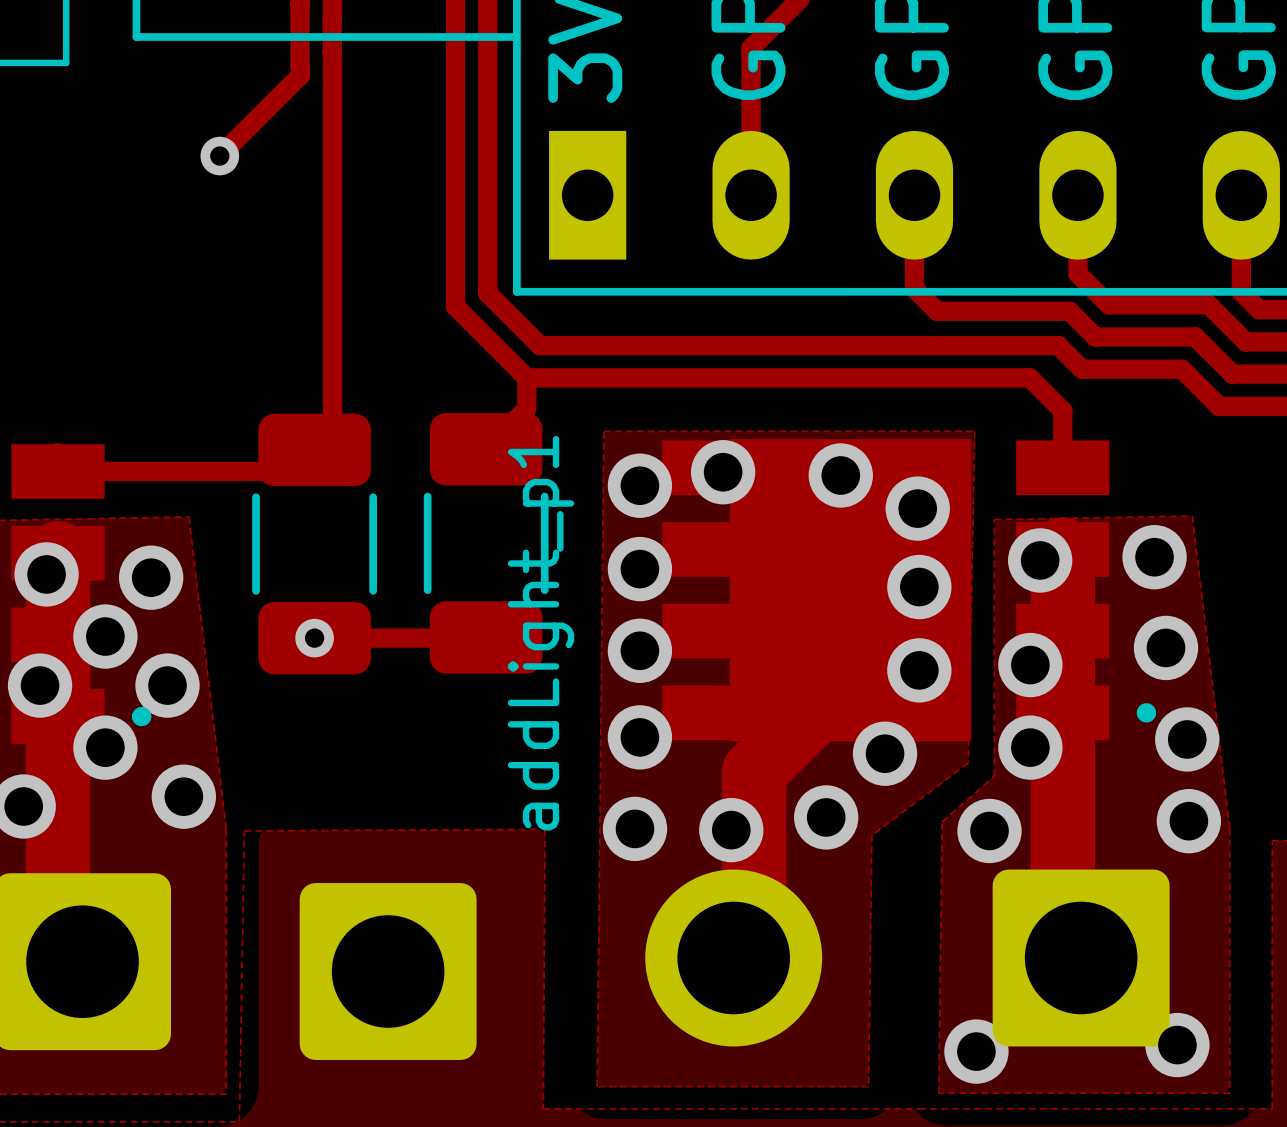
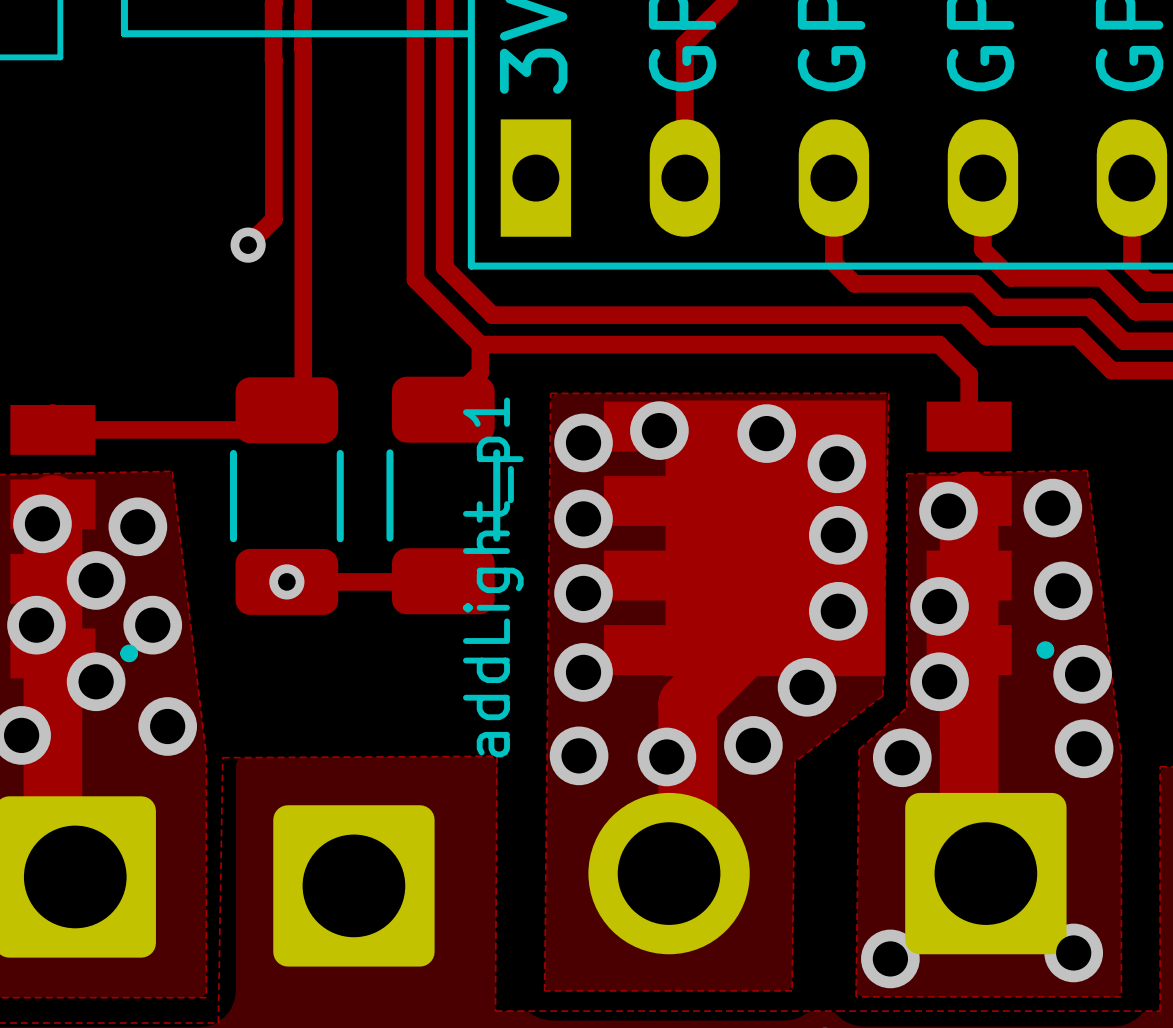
track: (300, 75) (219, 156) -> (273, 68) (273, 219) (248, 245)
via position: (219, 156) -> (248, 245)

